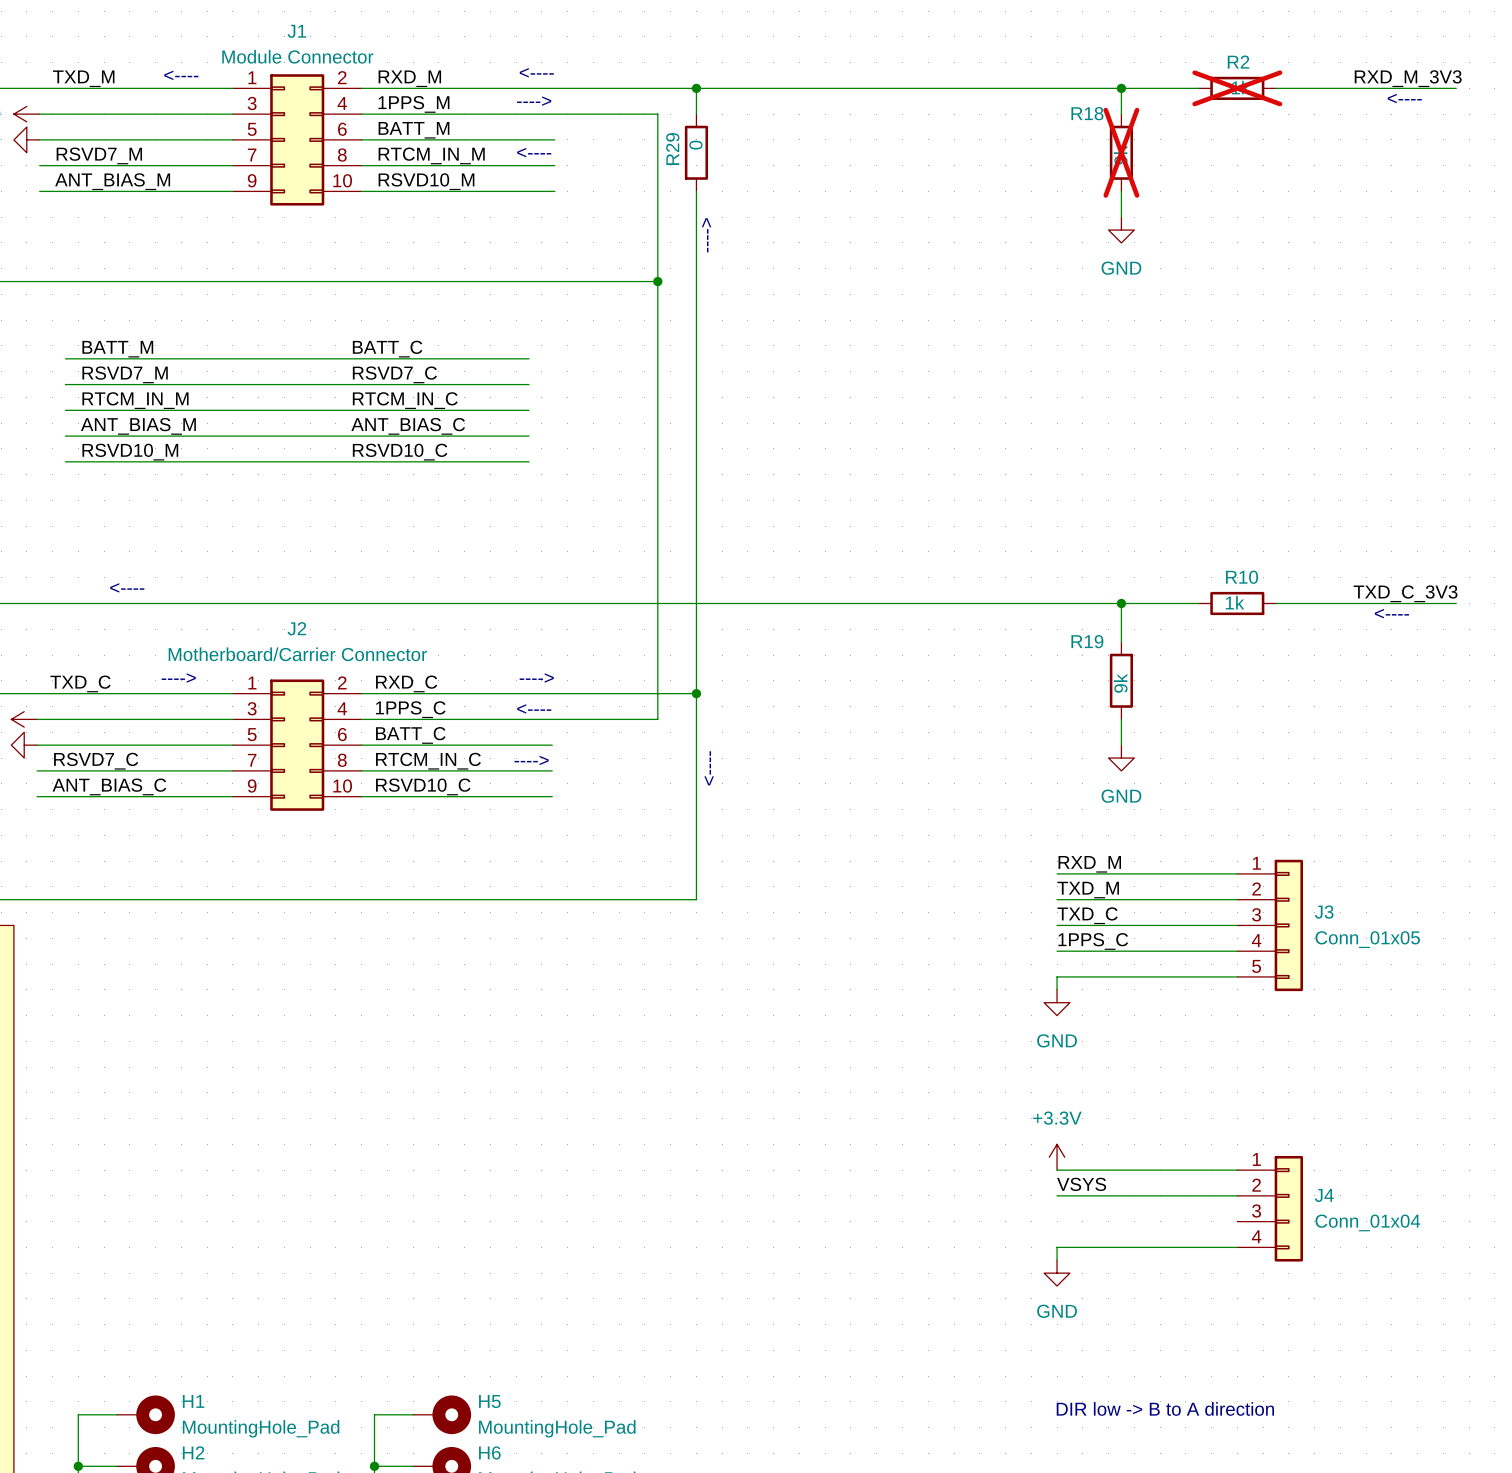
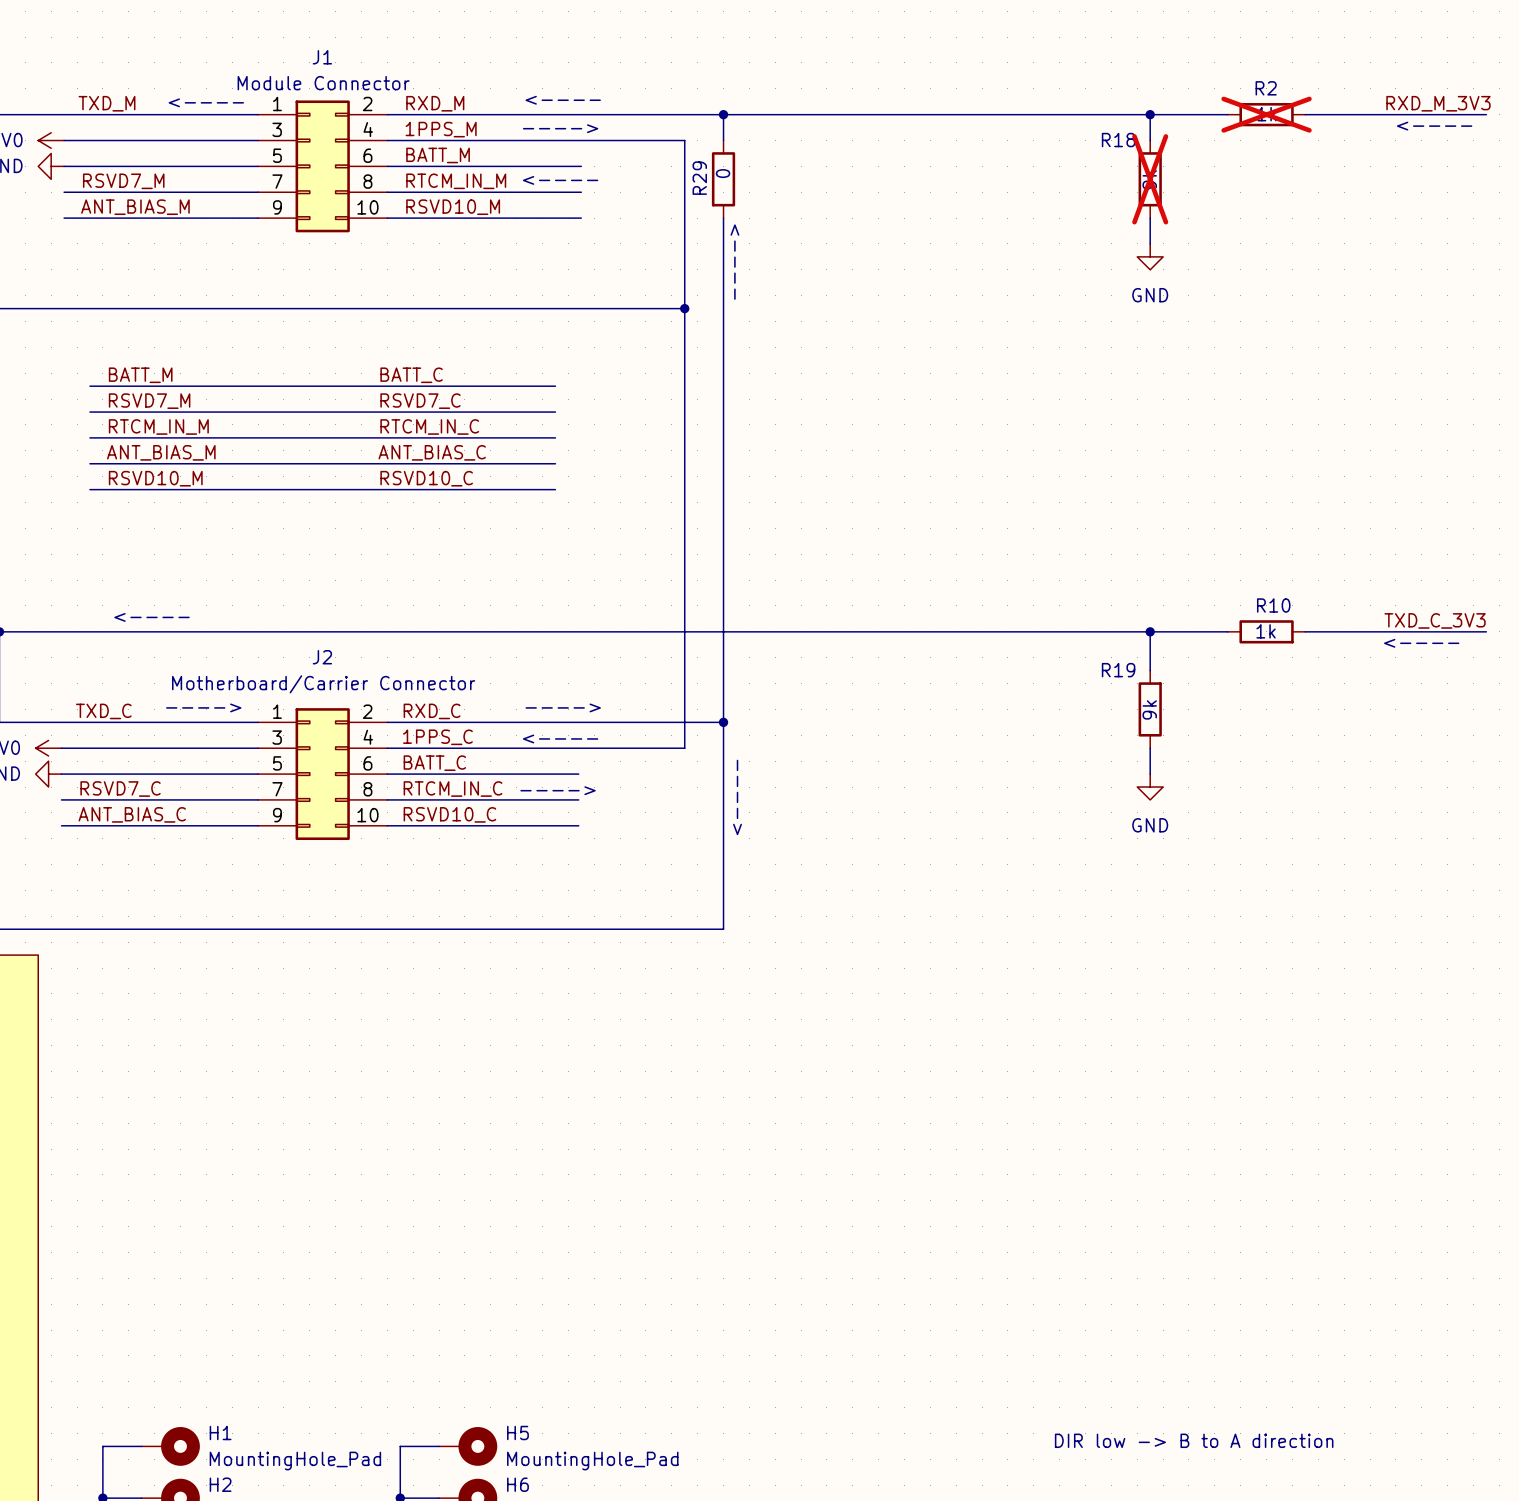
label: RXD_M (1089, 864) -> none
wire: (1057, 873) (1237, 873) -> none
label: TXD_M (1088, 890) -> none
wire: (1057, 899) (1237, 899) -> none
label: TXD_C (1087, 915) -> none
wire: (1057, 925) (1237, 925) -> none
J3: Conn_01x05 (1270, 925) -> none
label: 1PPS_C (1093, 941) -> none
wire: (1057, 951) (1237, 951) -> none
wire: (1237, 976) (1057, 976) (1057, 989) -> none
power symbol: GND (1057, 1002) -> none
power symbol: +3.3V (1057, 1157) -> none
wire: (1057, 1170) (1237, 1170) -> none
label: VSYS (1081, 1184) -> none
wire: (1057, 1195) (1237, 1195) -> none
J4: Conn_01x04 (1270, 1208) -> none
wire: (1237, 1247) (1057, 1247) (1057, 1260) -> none
power symbol: GND (1057, 1273) -> none

